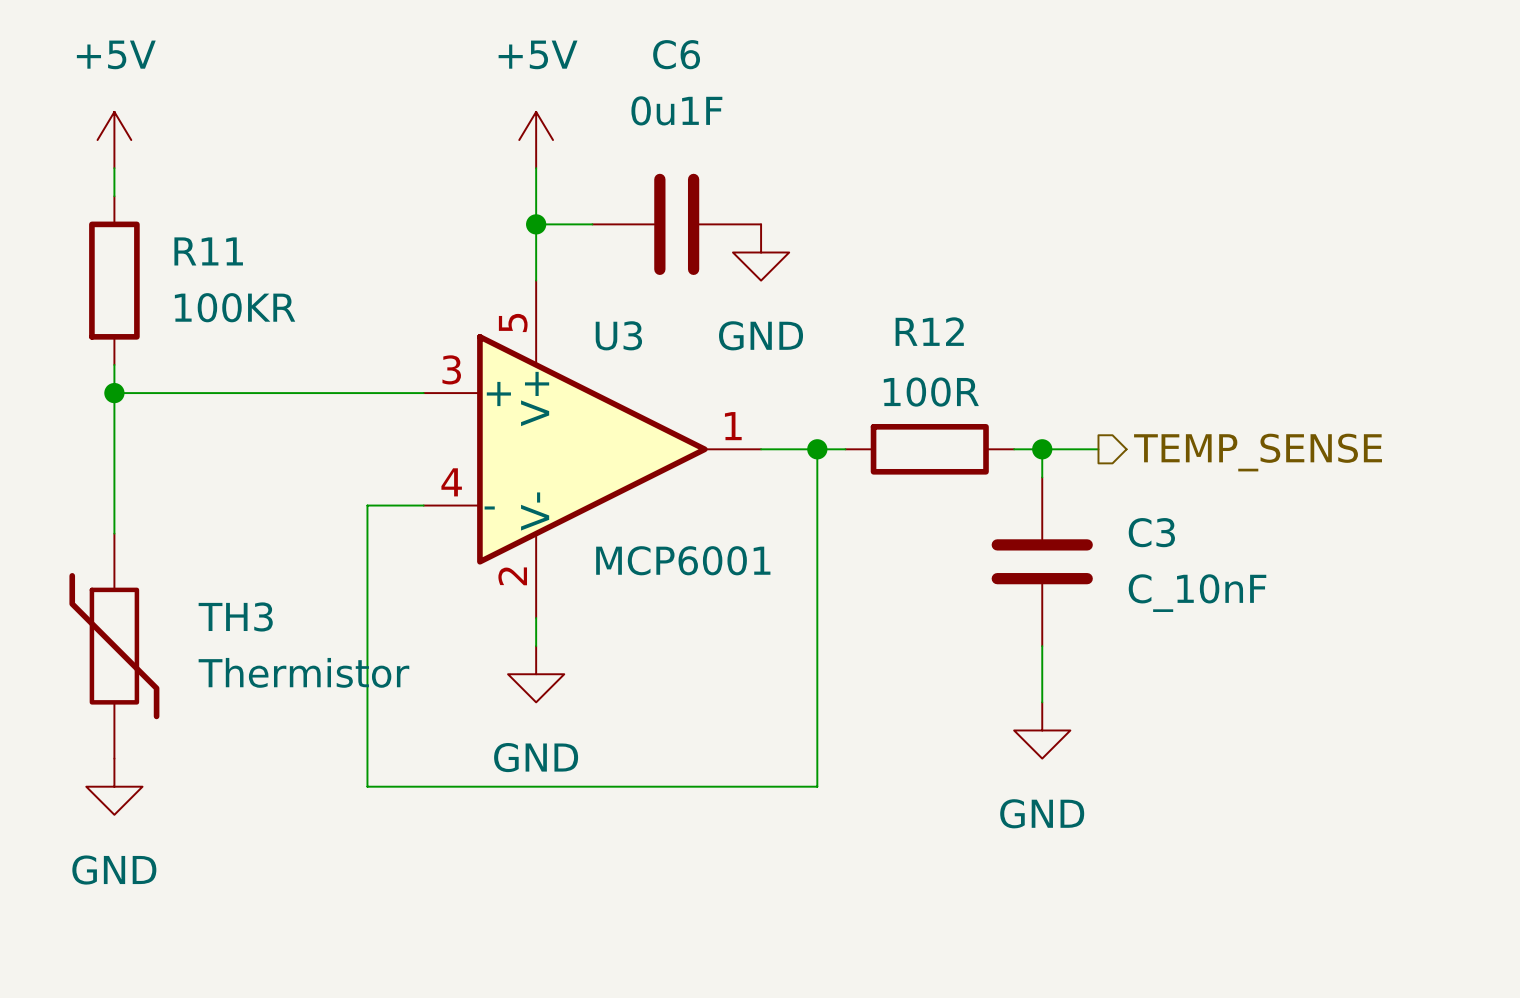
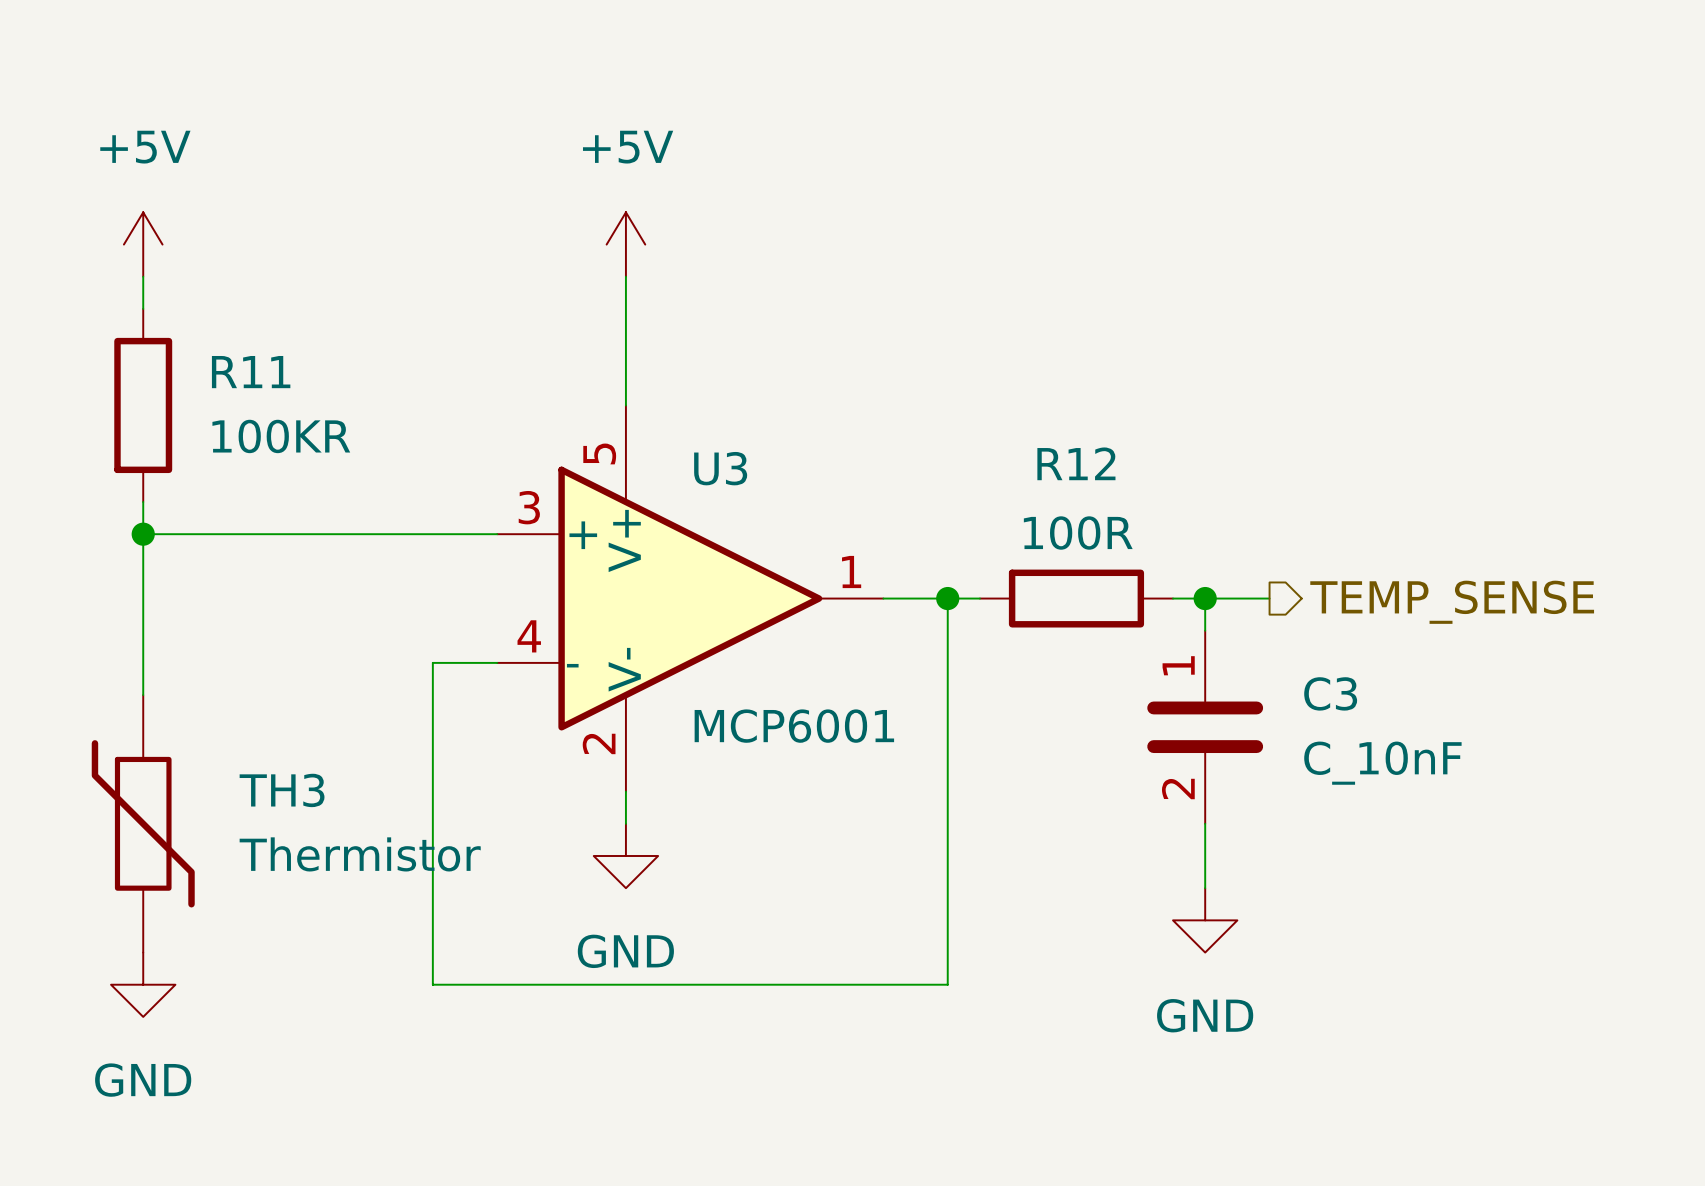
wire: (536, 224) (592, 224) -> none
junction: (536, 224) -> none
C6: 0u1F (676, 224) -> none
power symbol: GND (761, 252) -> none
C3 pin number: none -> 1 (1178, 665)
C3 pin number: none -> 2 (1178, 789)

